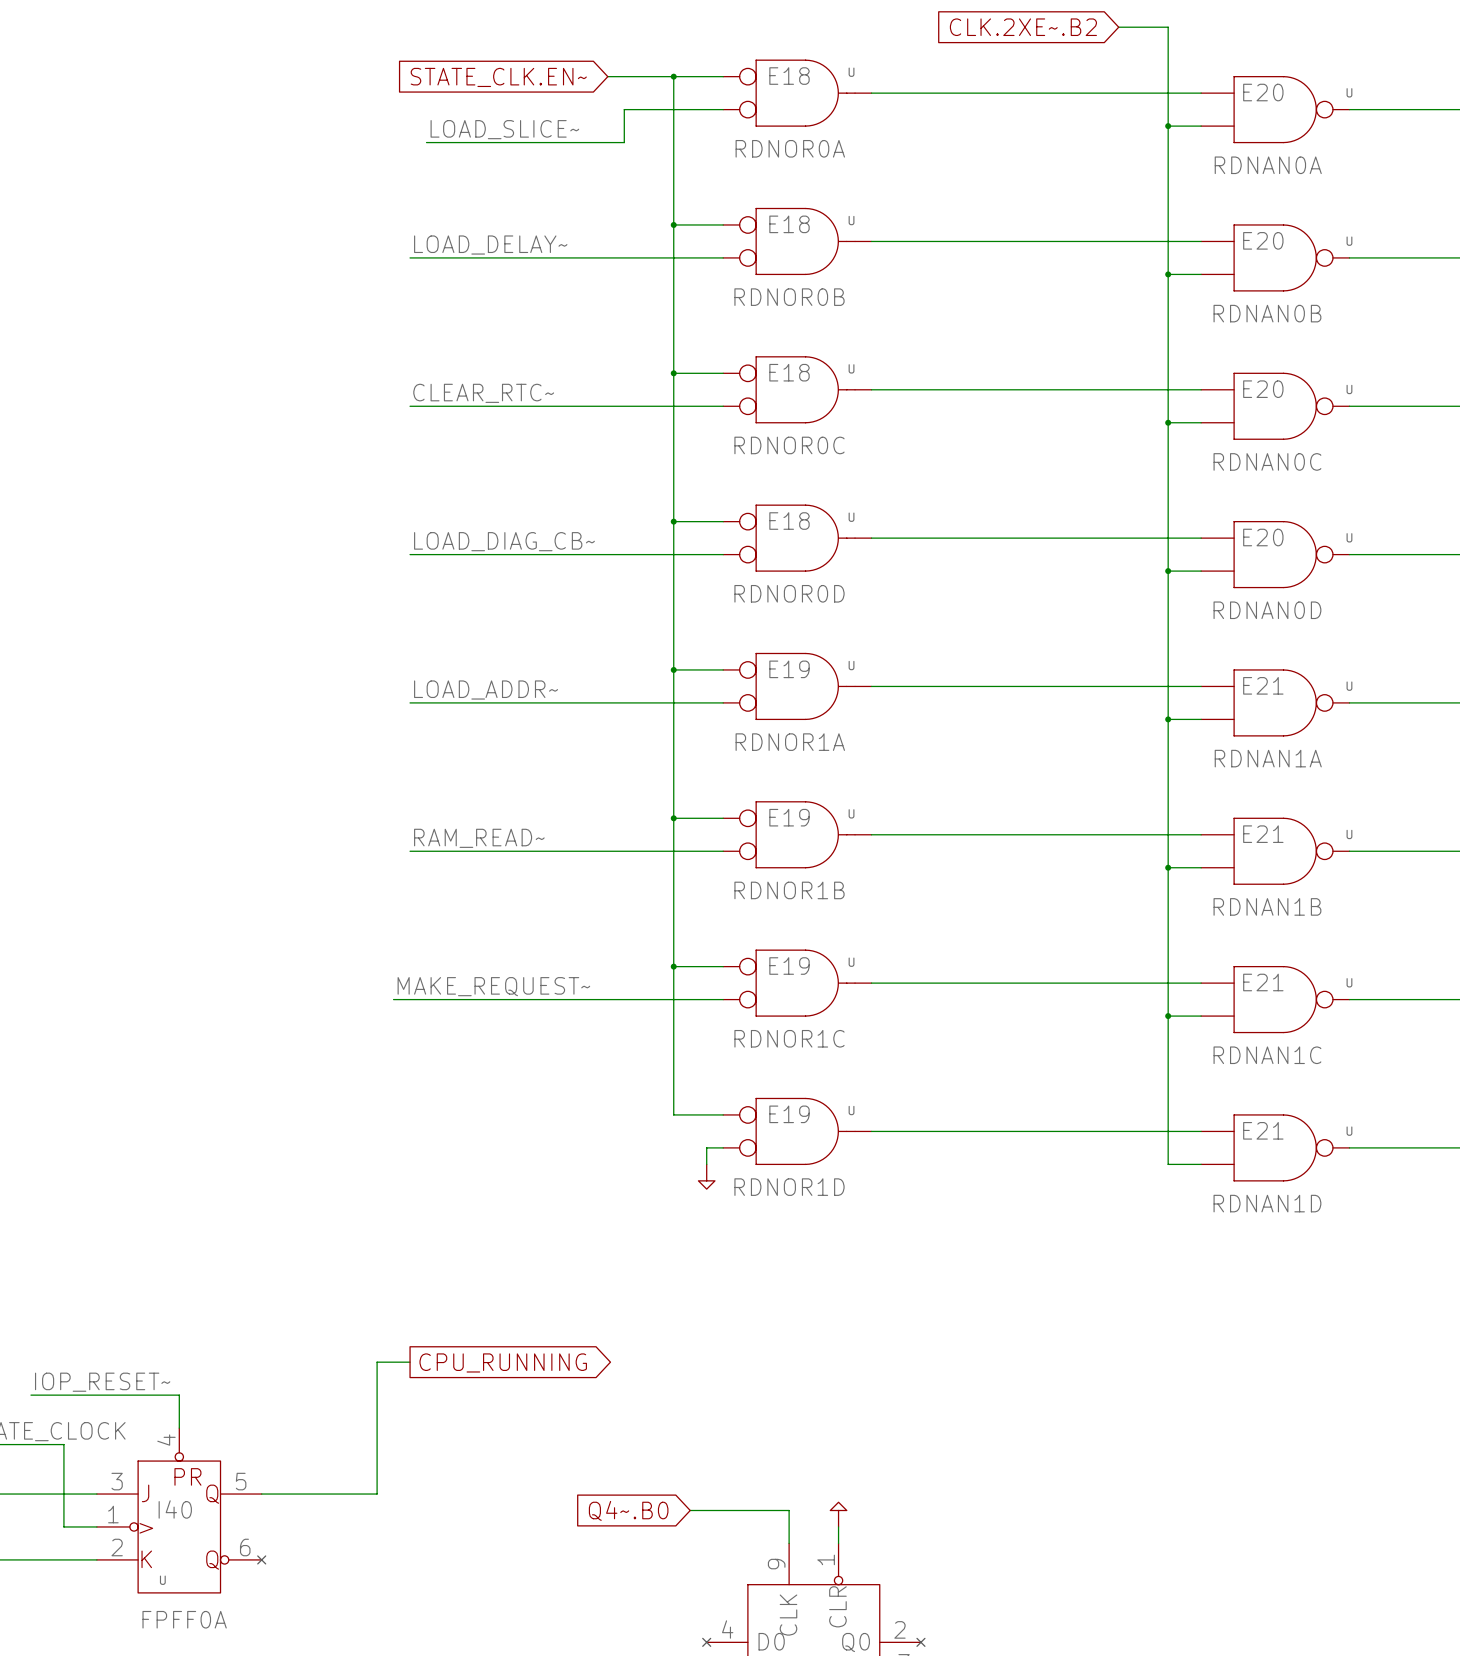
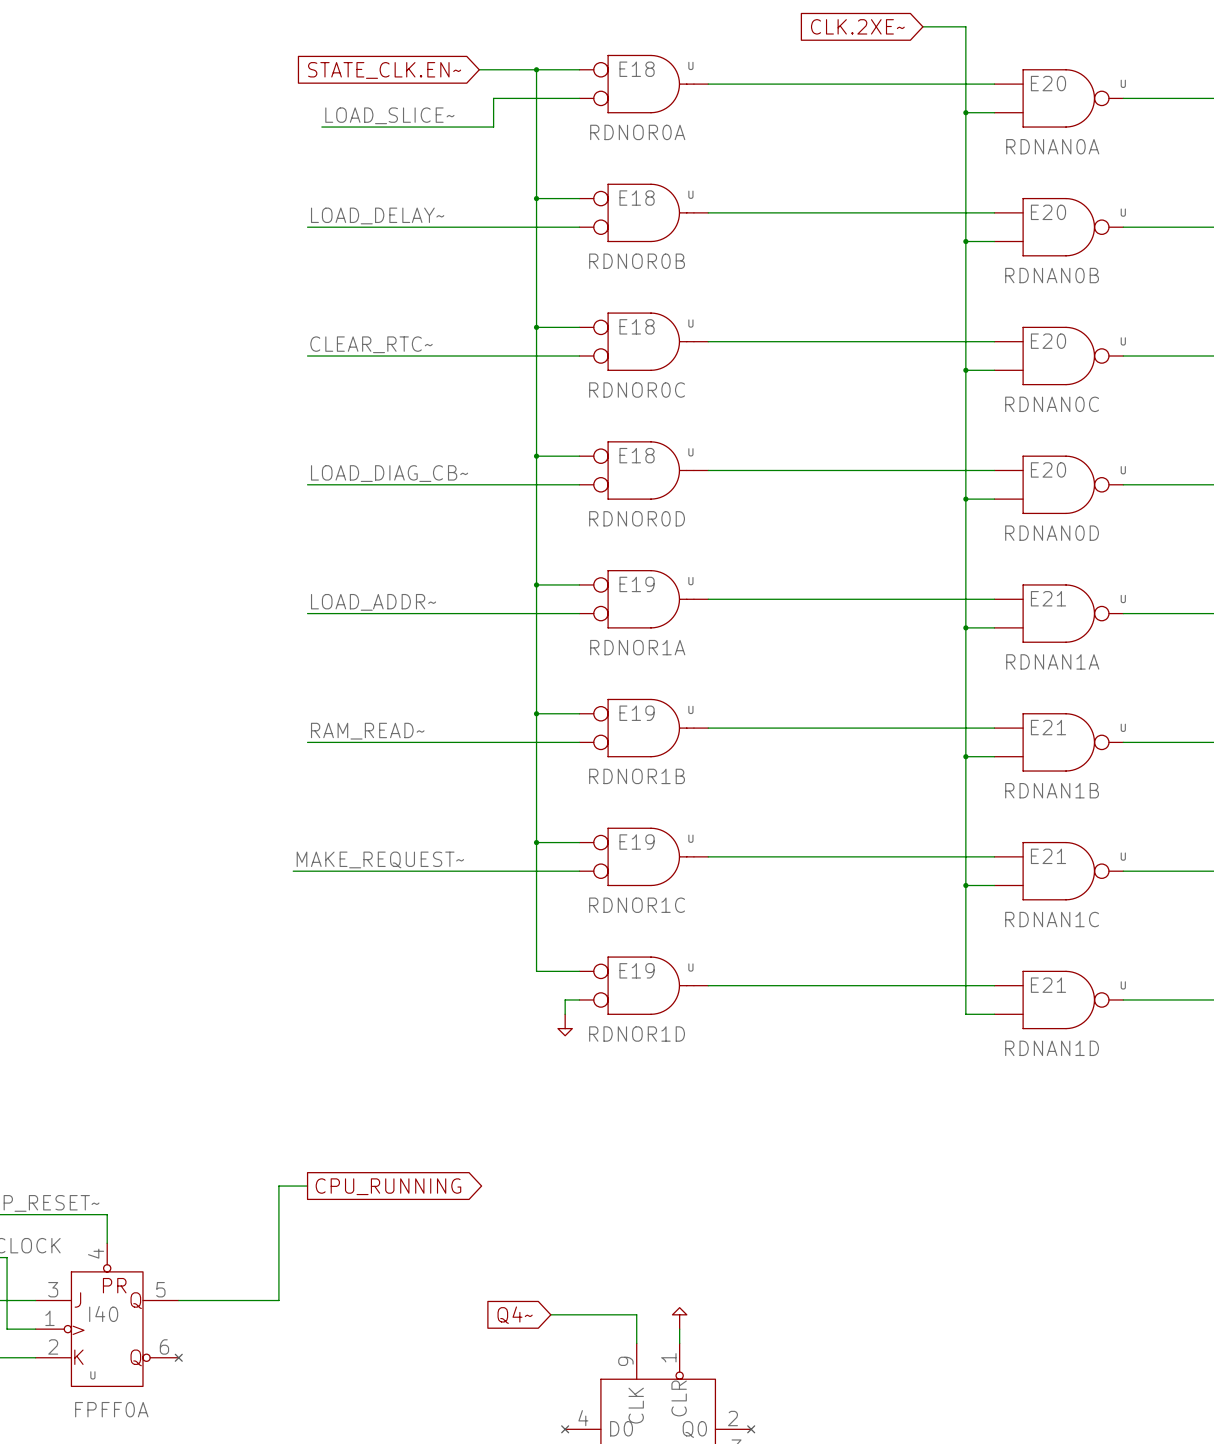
global label: CLK.2XE~.B2 (1023, 27) -> CLK.2XE~ (857, 26)
global label: Q4~.B0 (628, 1510) -> Q4~ (515, 1315)

